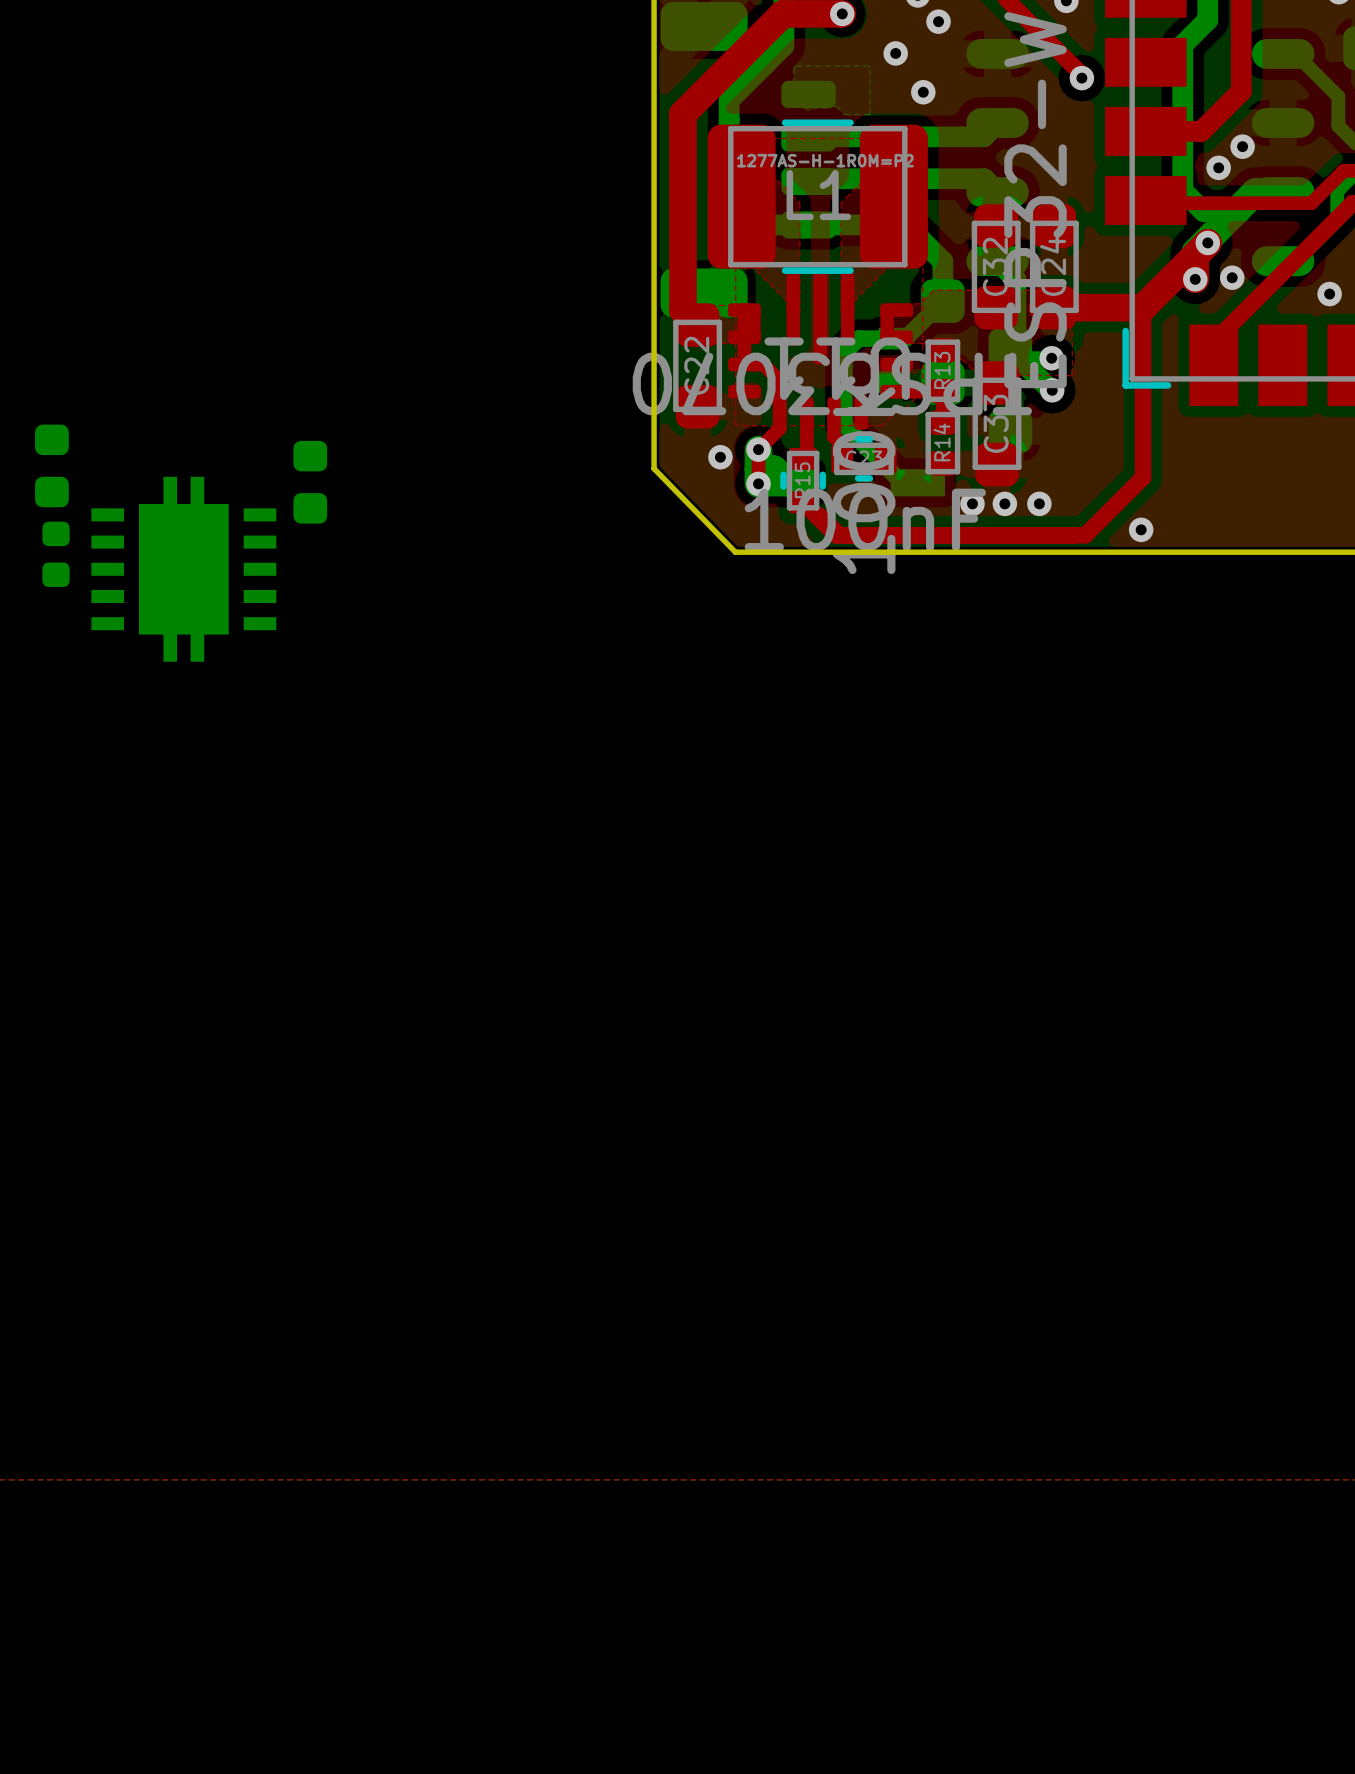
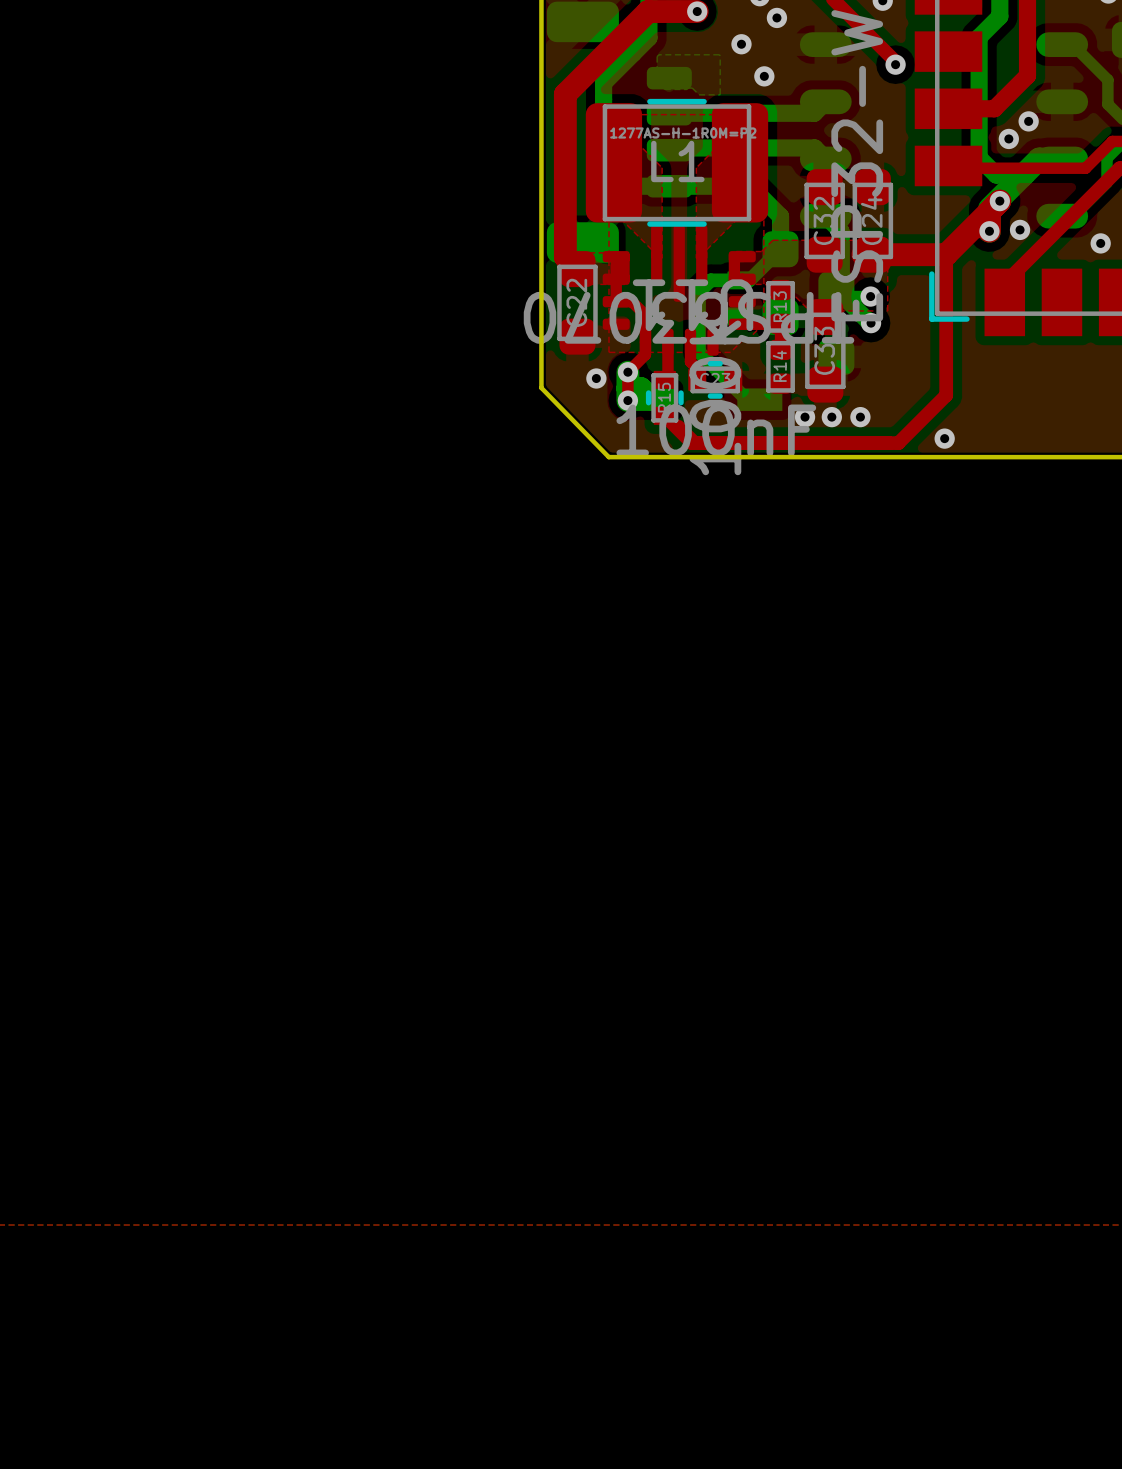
part: (51, 465) -> none
part: (310, 482) -> none
part: (56, 554) -> none
part: (183, 569) -> none

